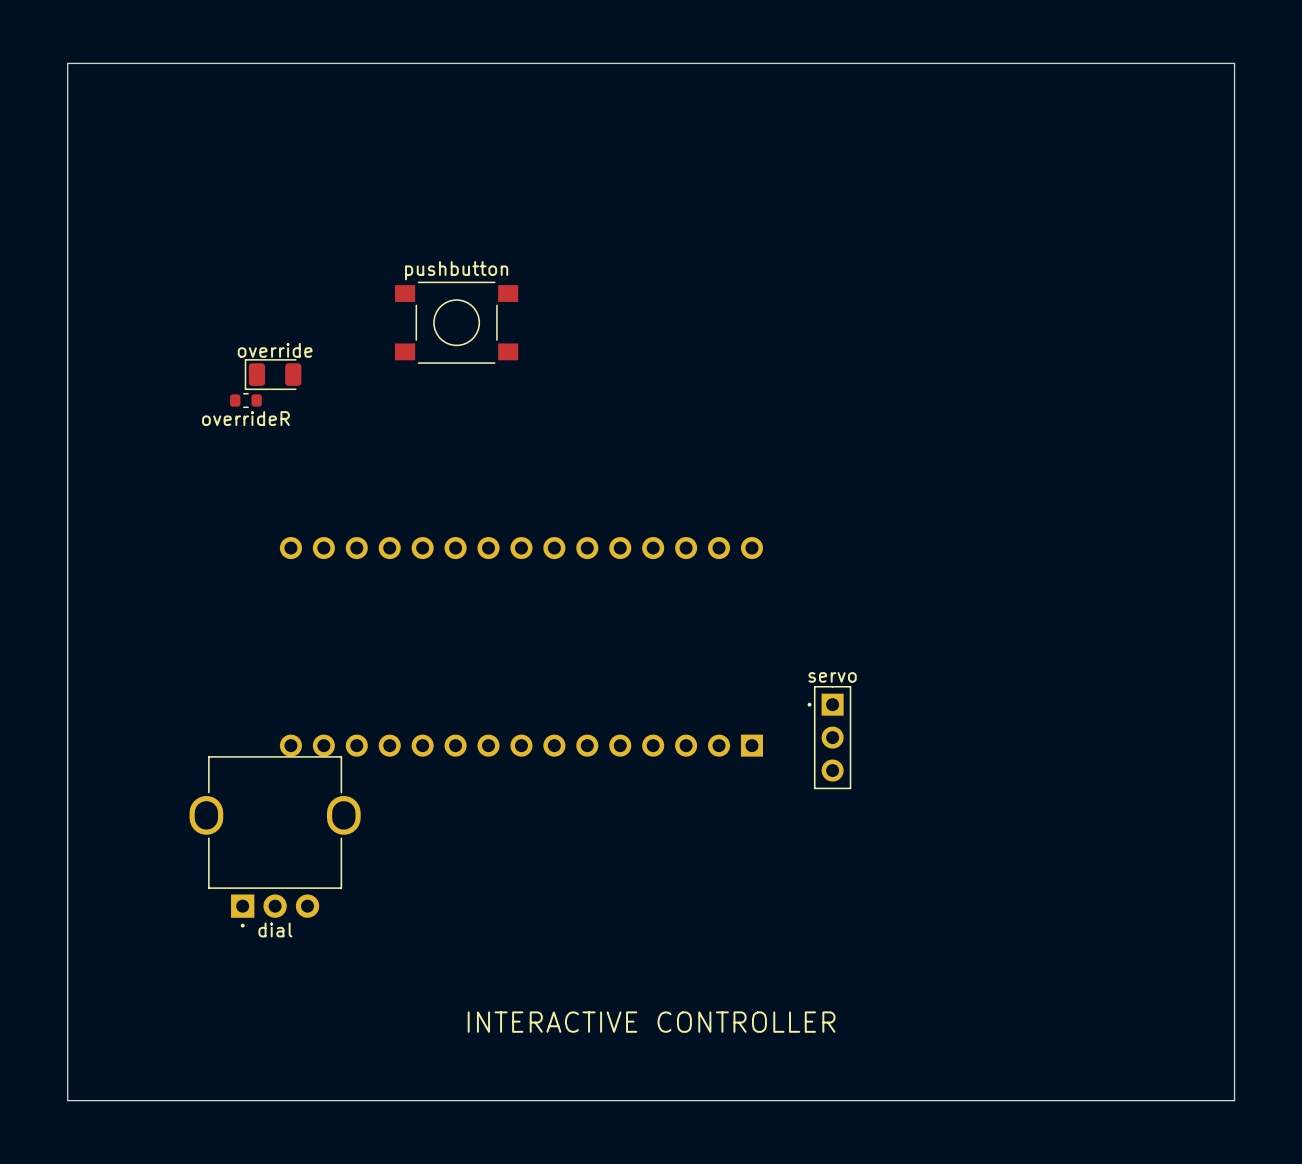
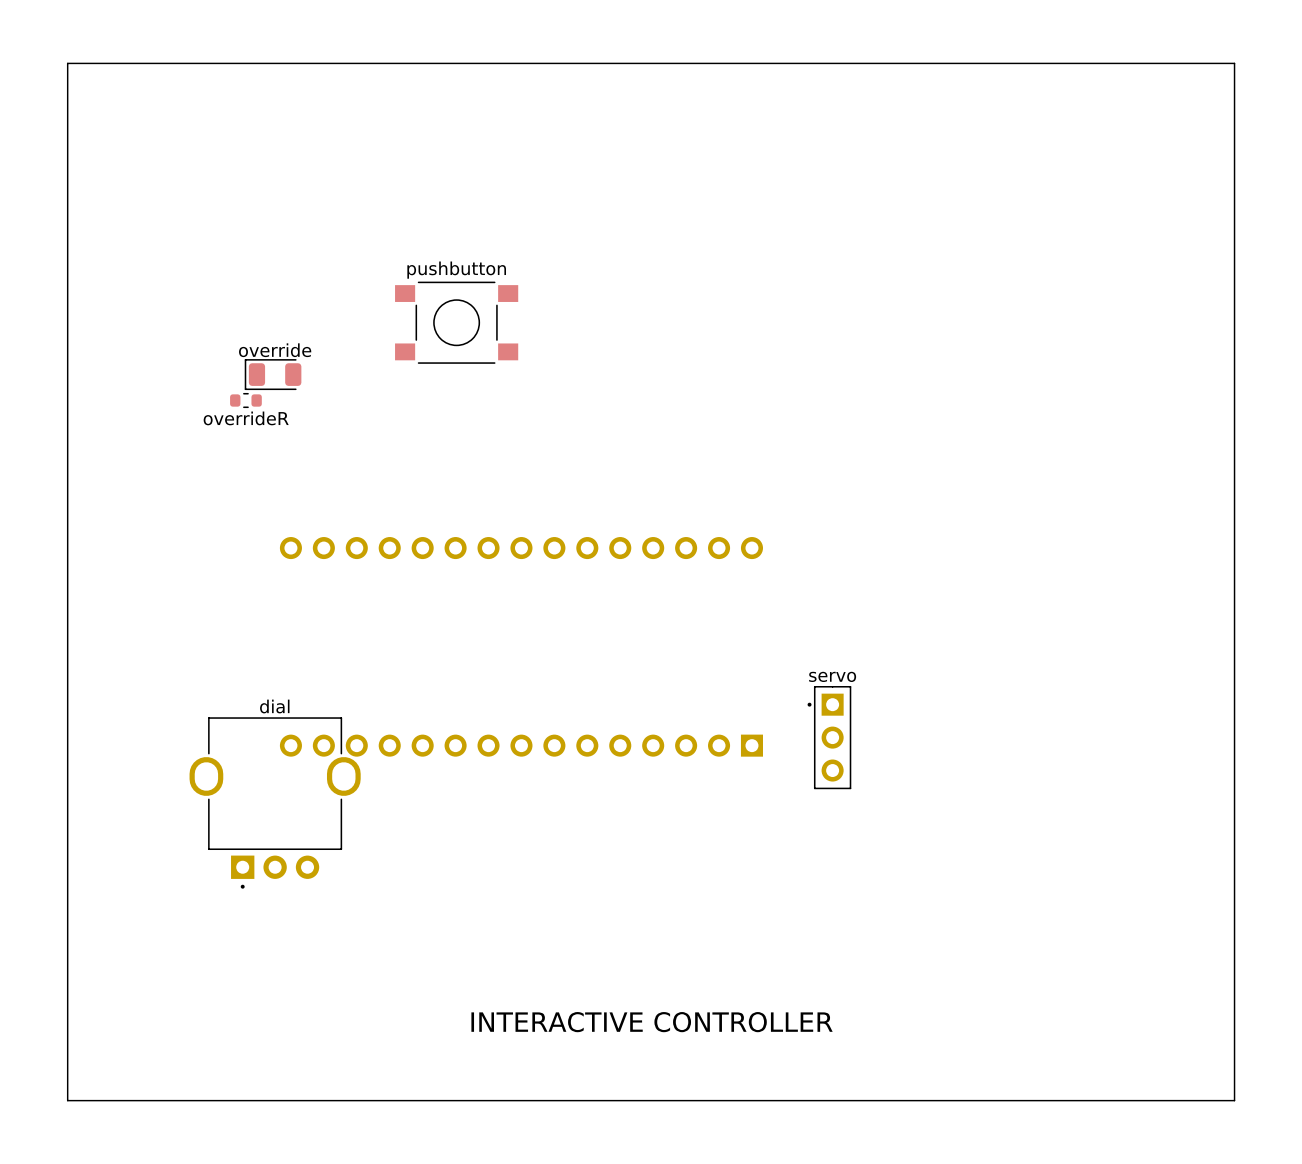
dial position: (275, 841) -> (275, 802)
dial name position: dial (275, 929) -> dial (274, 706)

